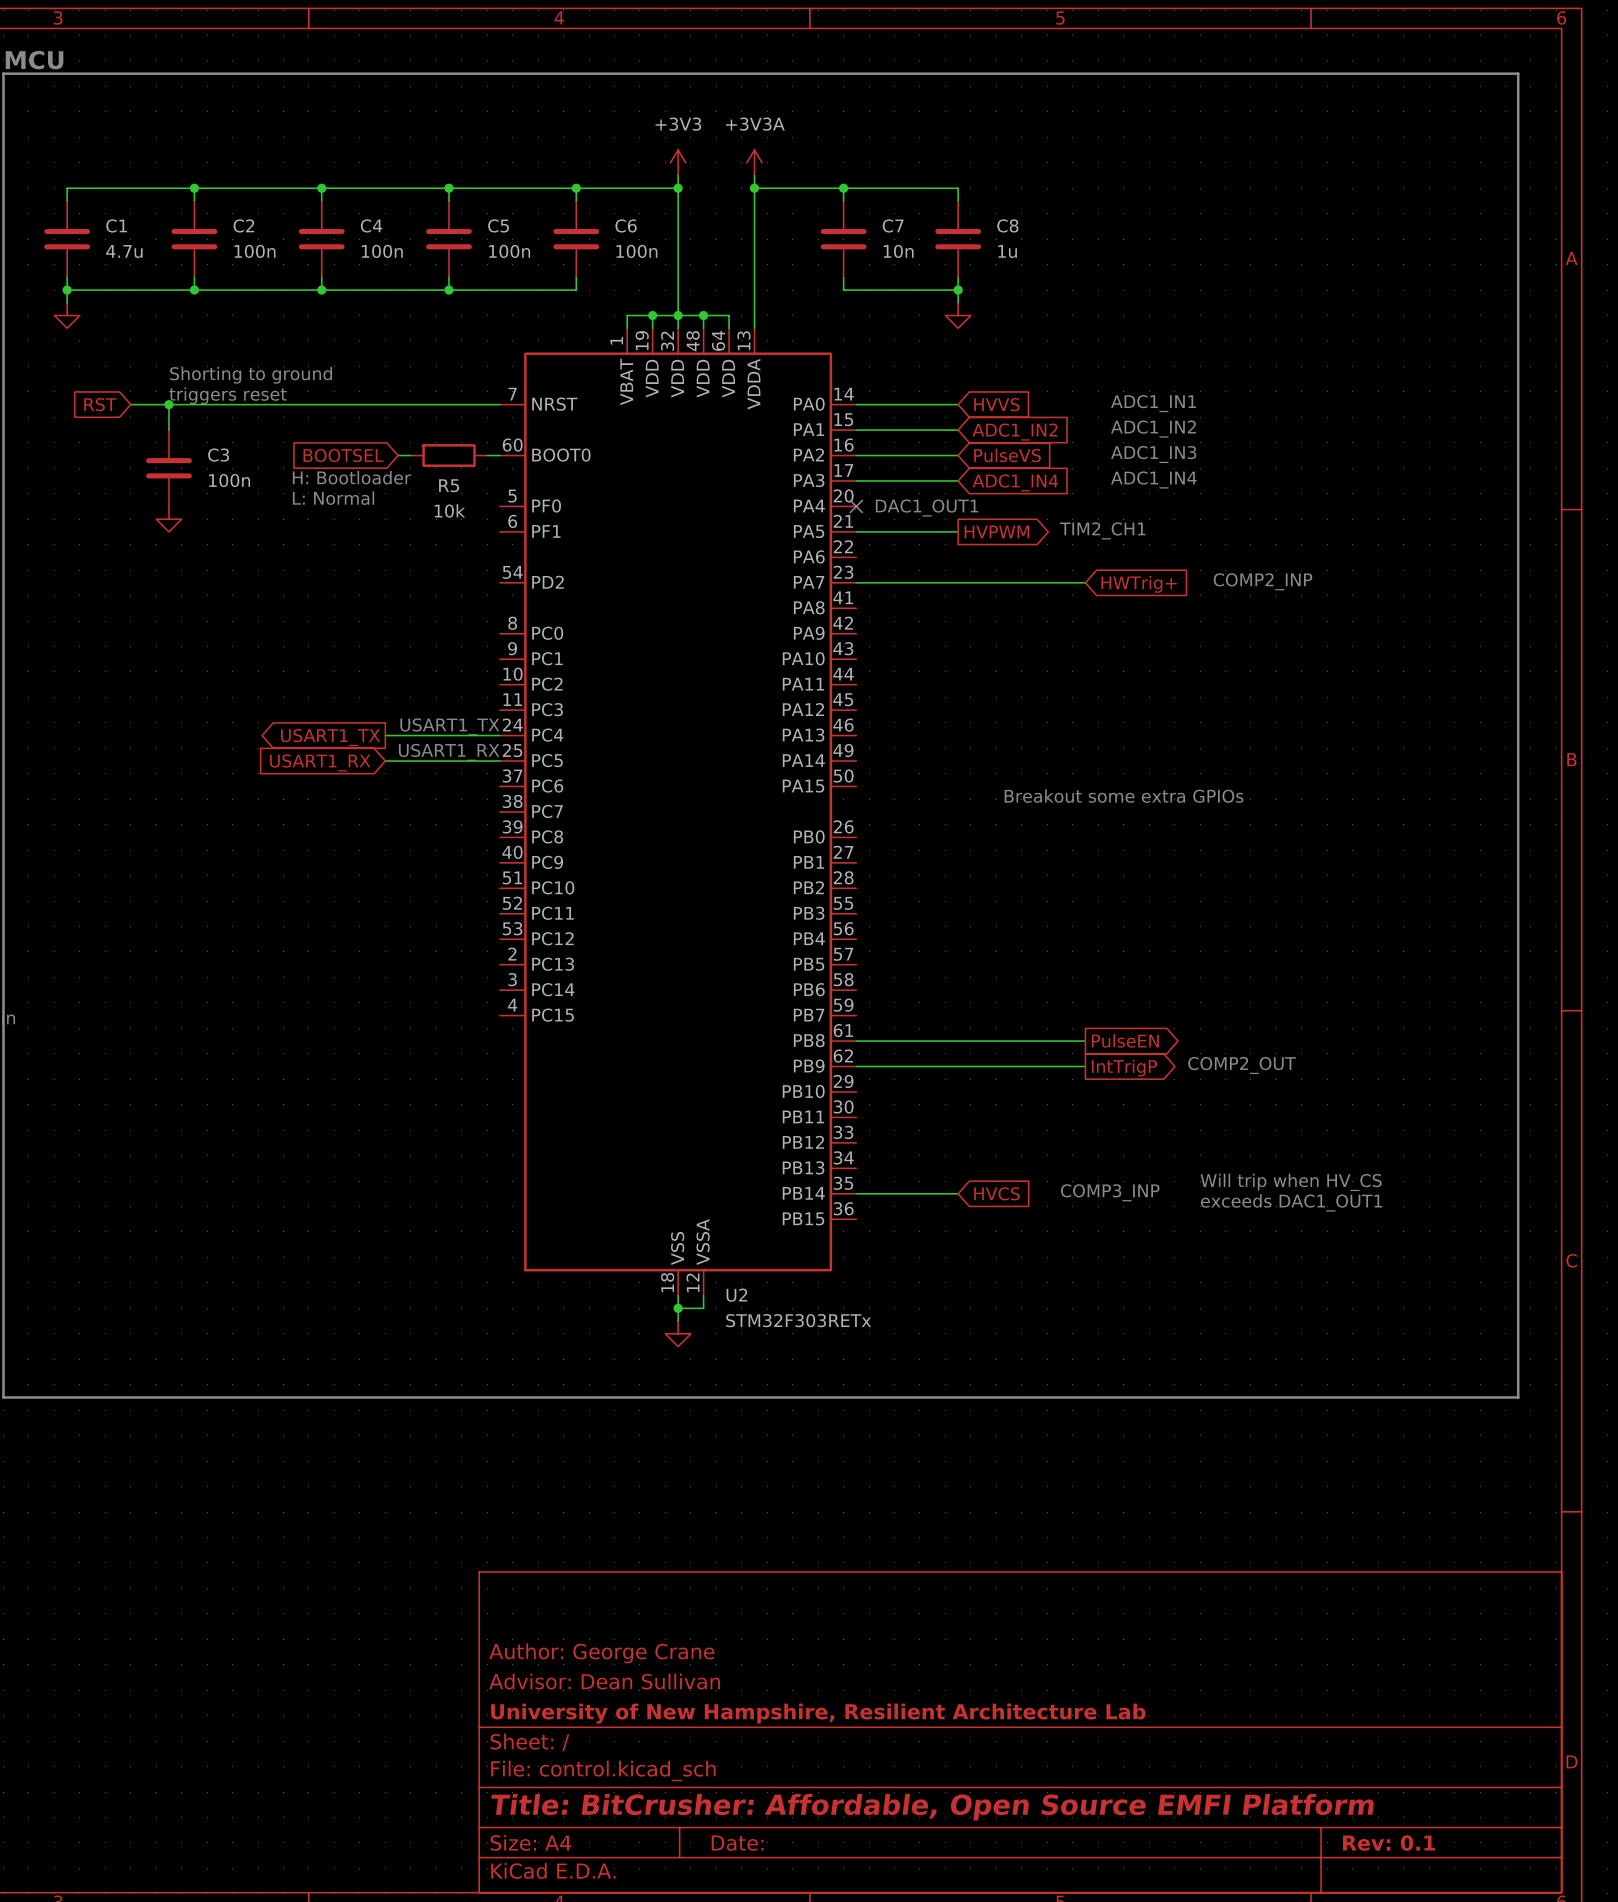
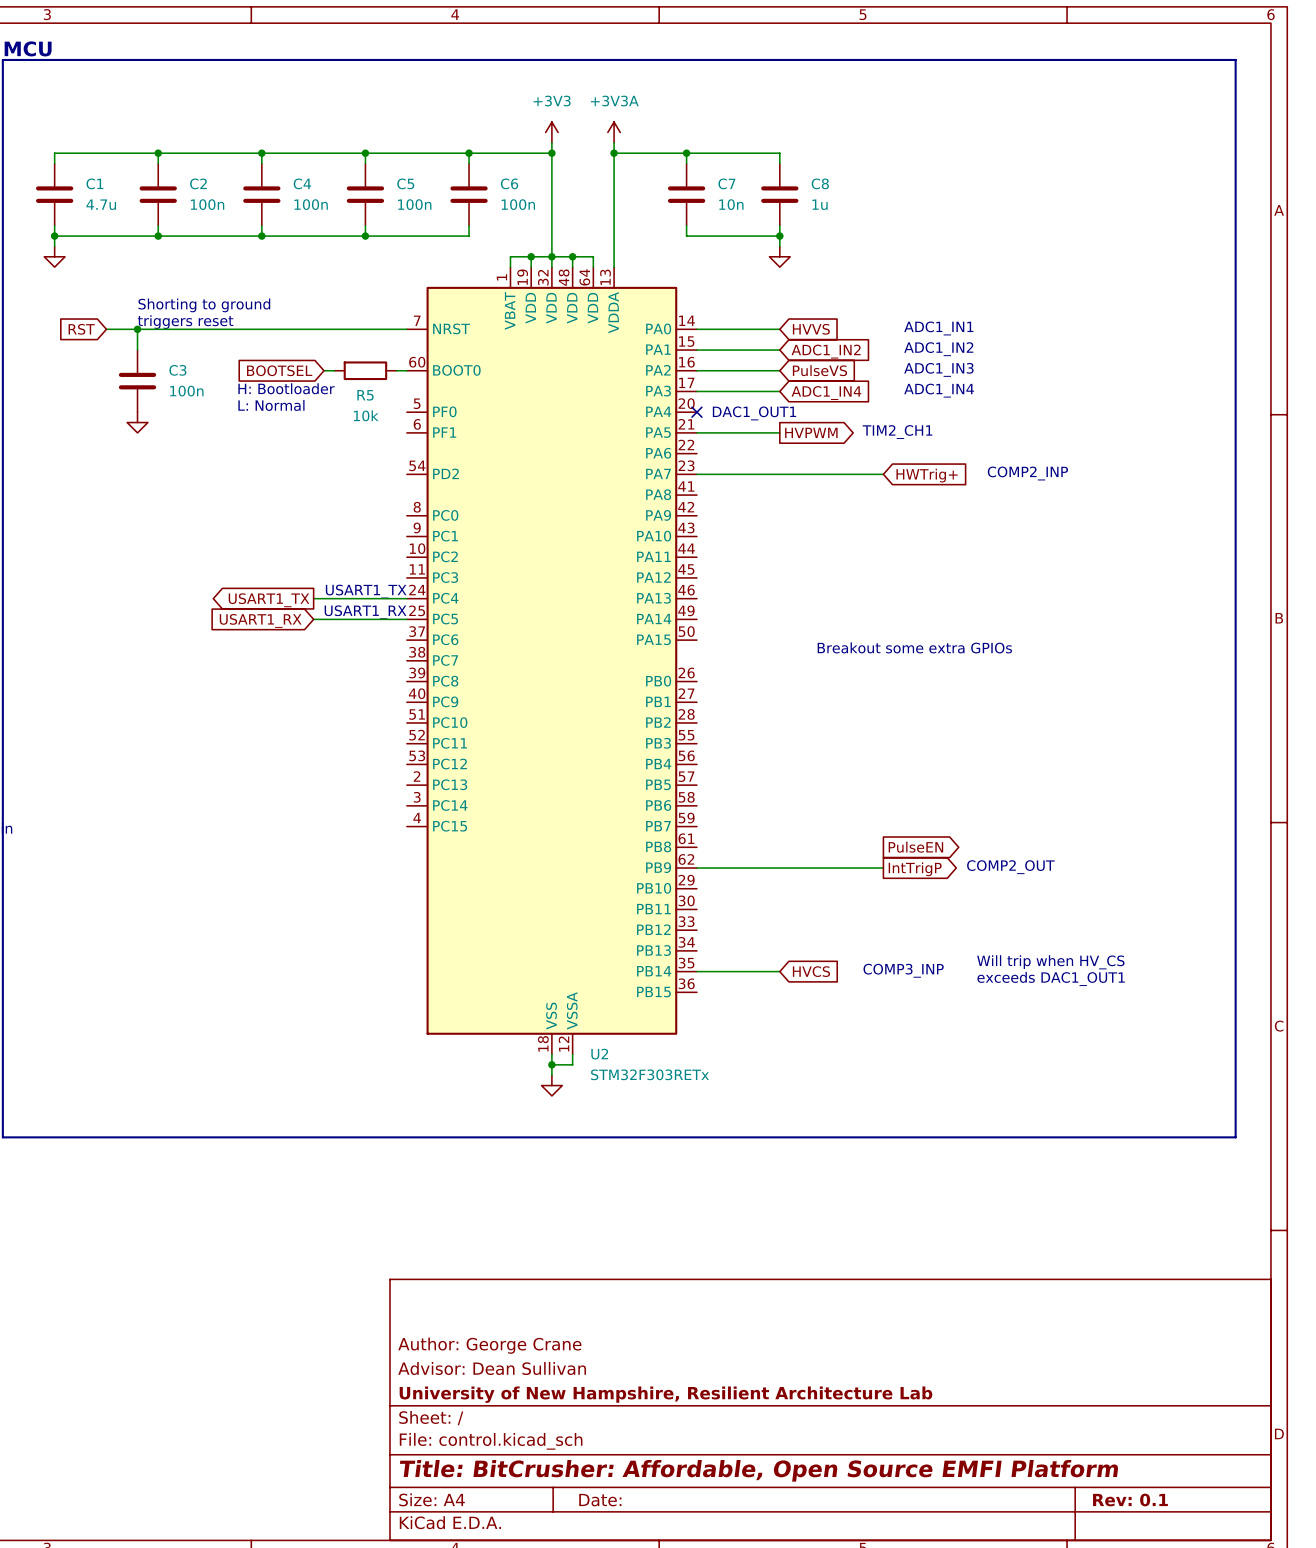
wire: (856, 1041) (1085, 1041) -> none

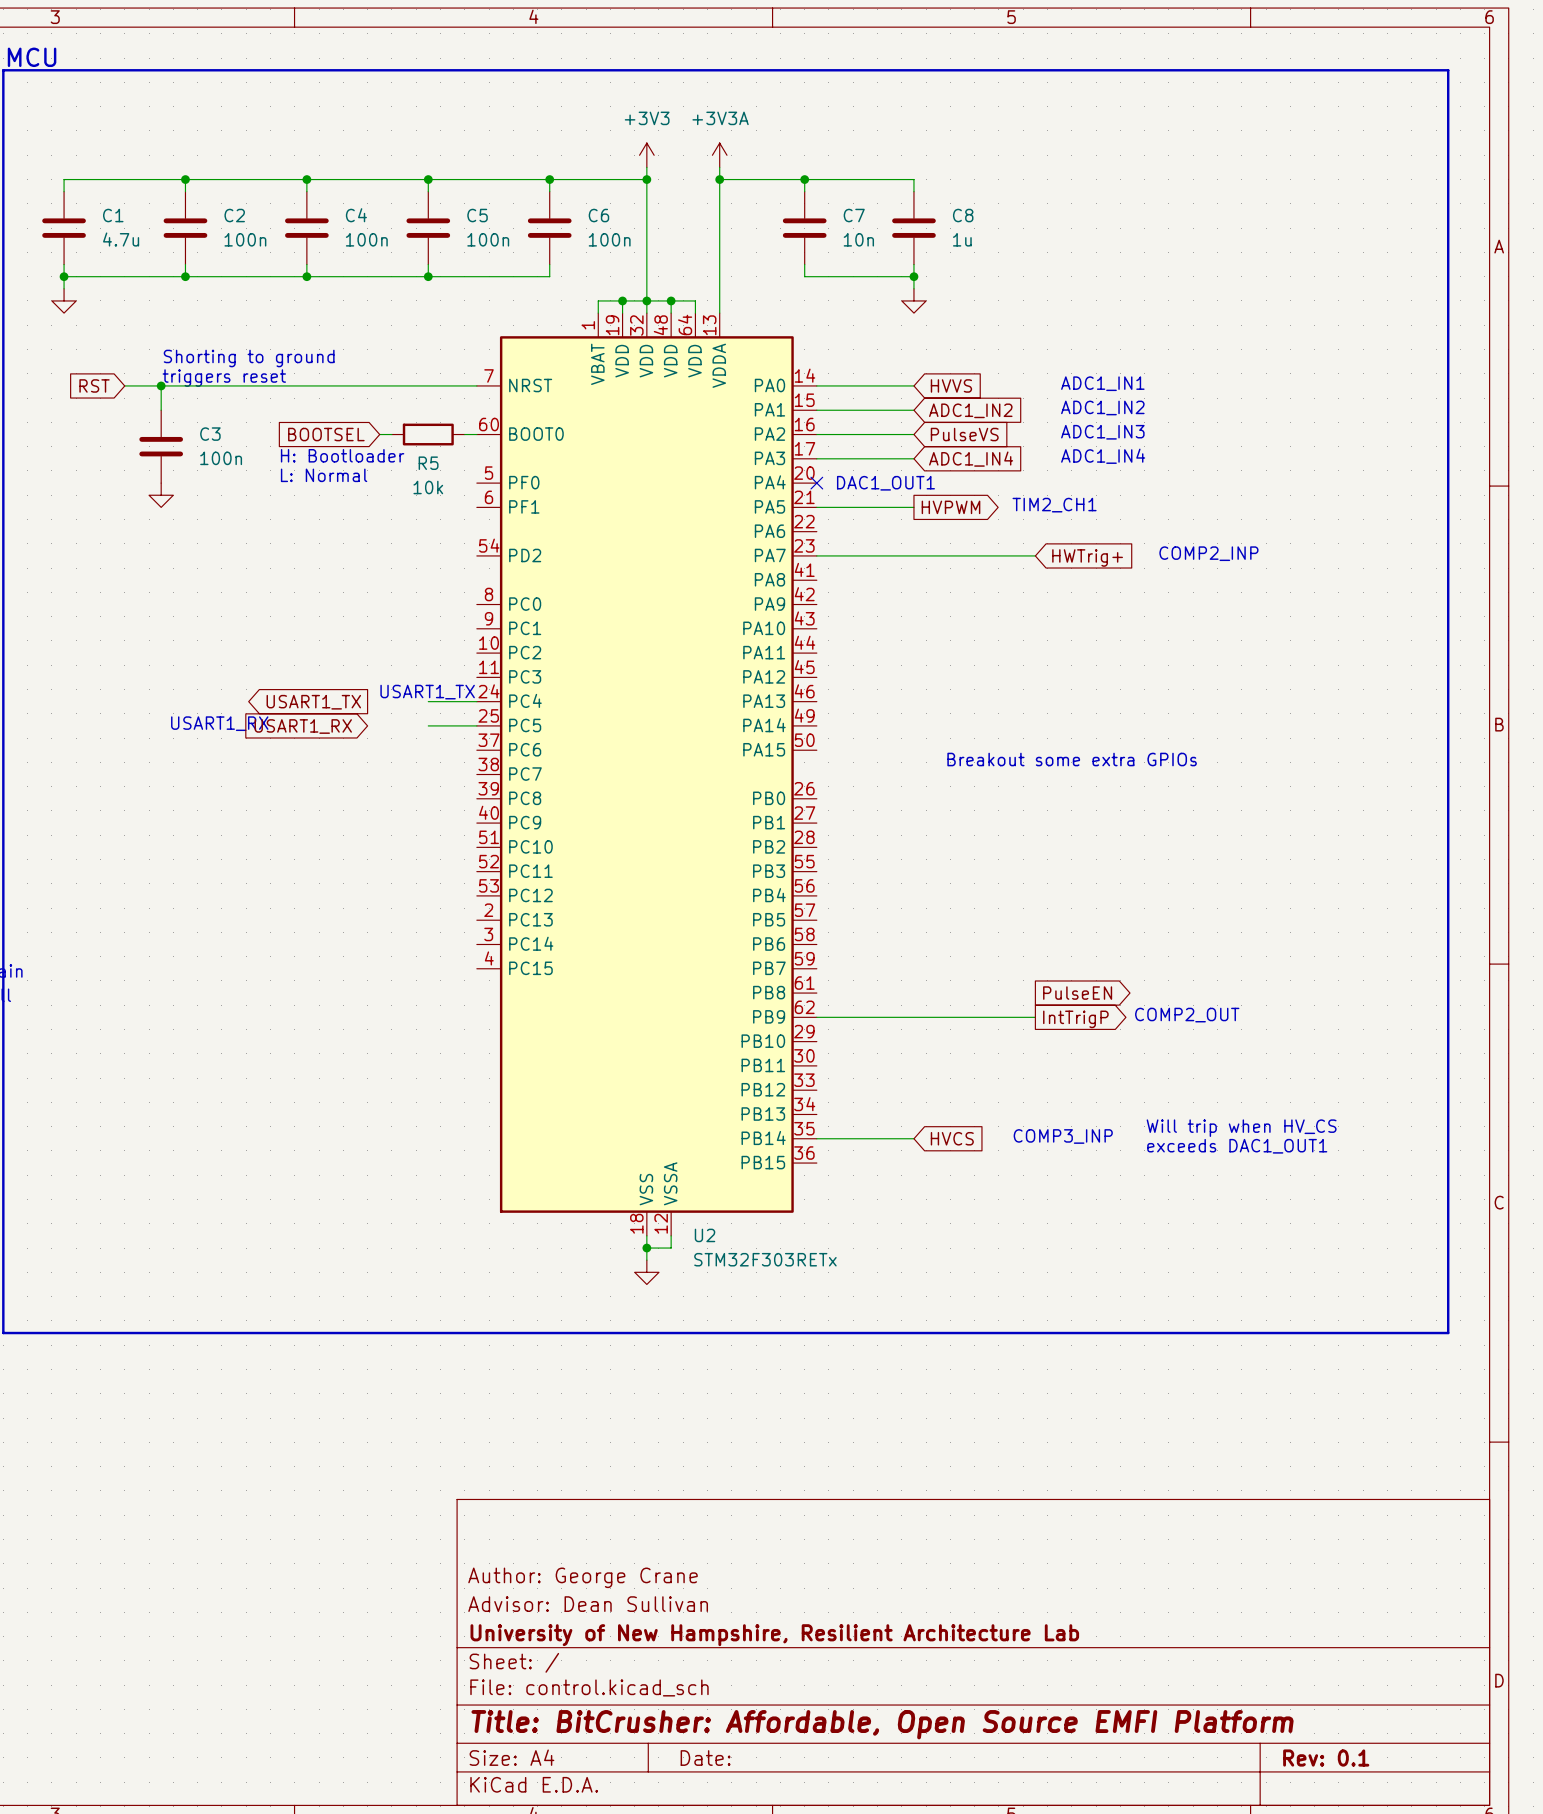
wire: (313, 598) (365, 598) -> none
text position: USART1_RX (365, 612) -> USART1_RX (219, 723)
wire: (313, 619) (365, 619) -> none

